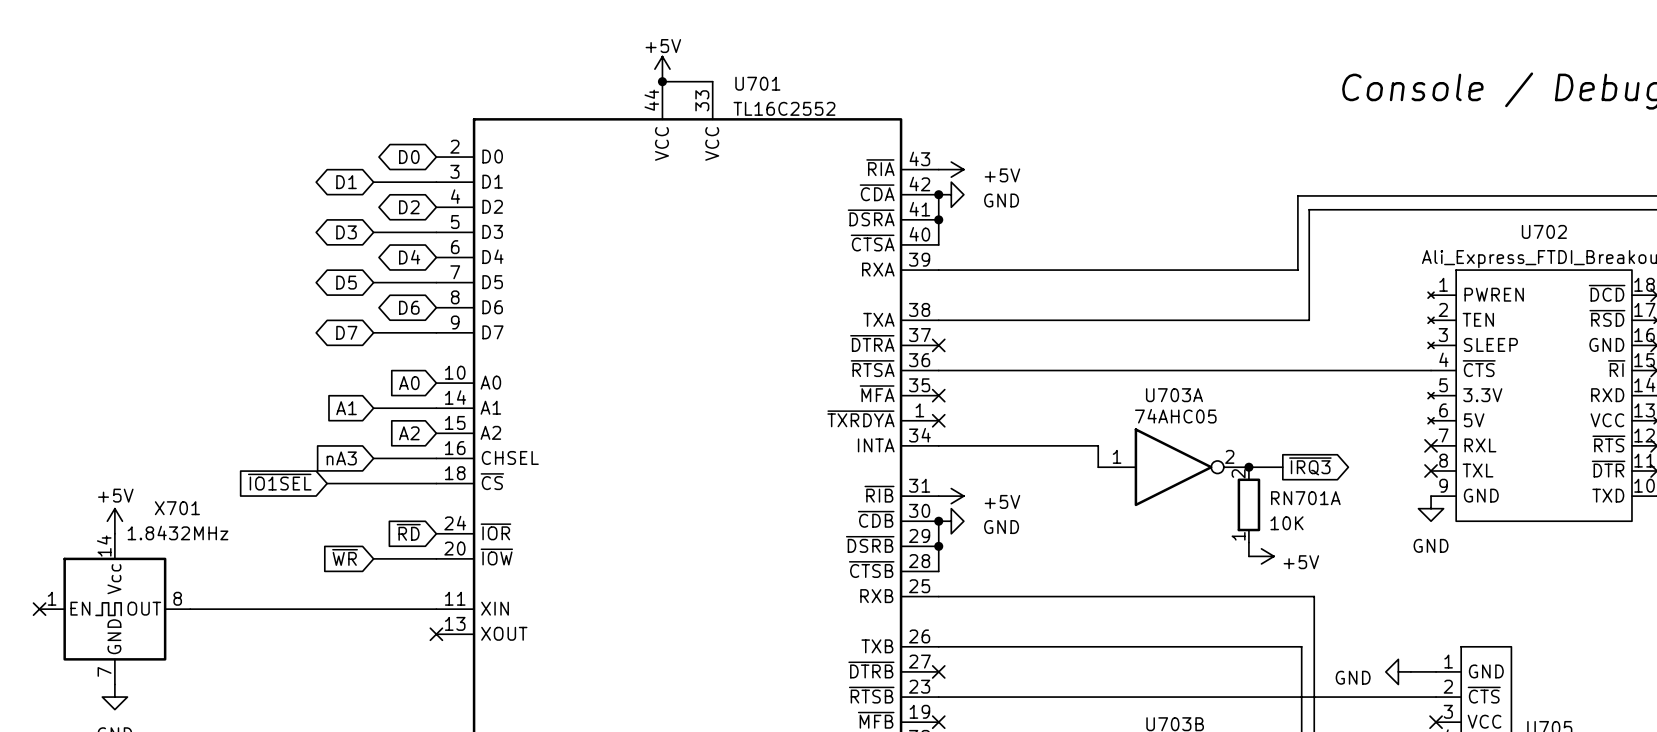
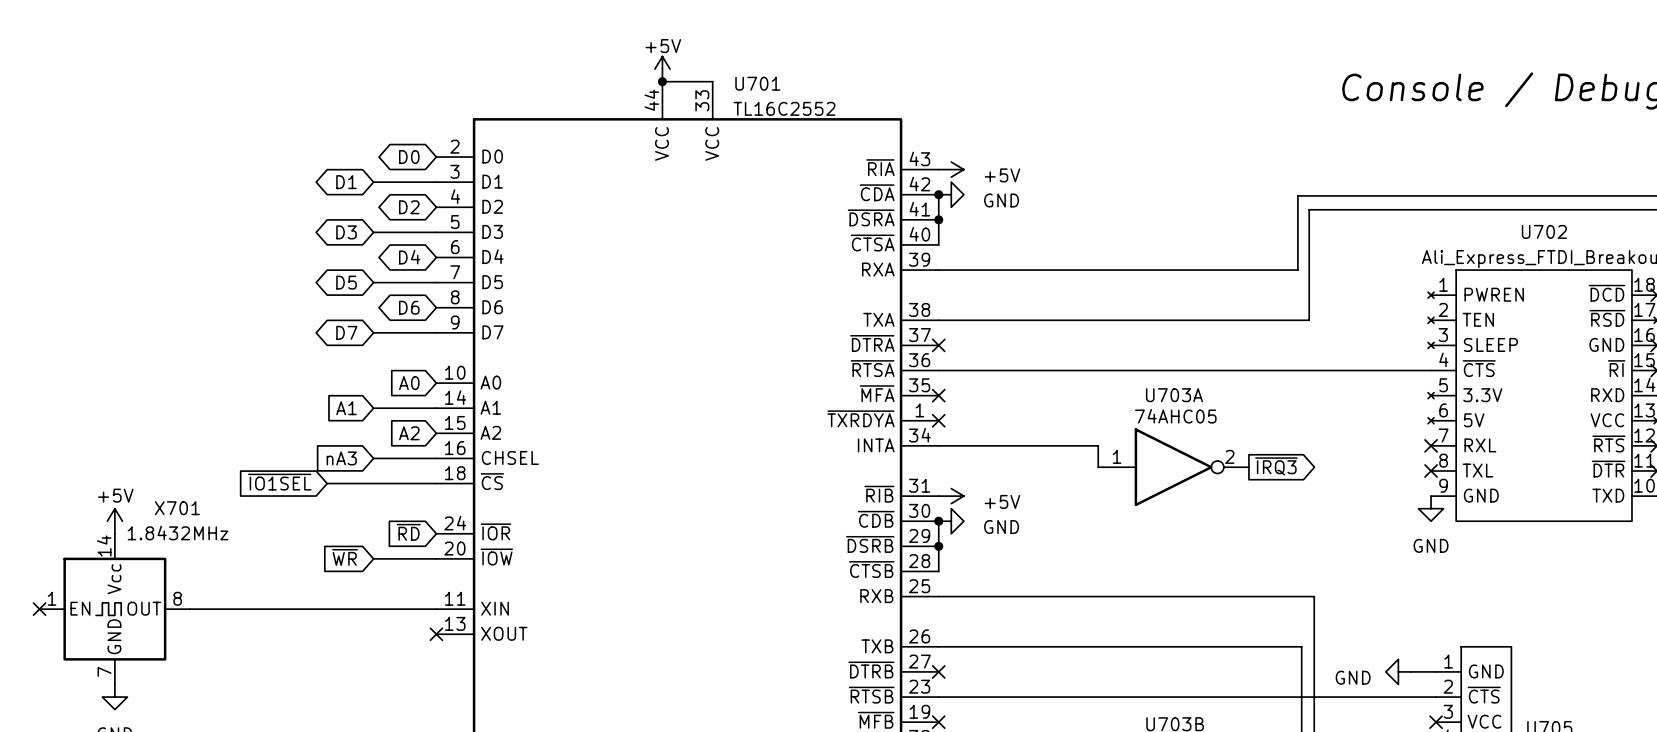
global label position: ~{IRQ3} (1310, 466) -> ~{IRQ3} (1276, 466)
wire: (1248, 467) (1282, 467) -> none
junction: (1248, 467) -> none
RN701A: 10K (1248, 504) -> none
wire: (1248, 542) (1248, 556) -> none
power symbol: +5V (1261, 556) -> none

